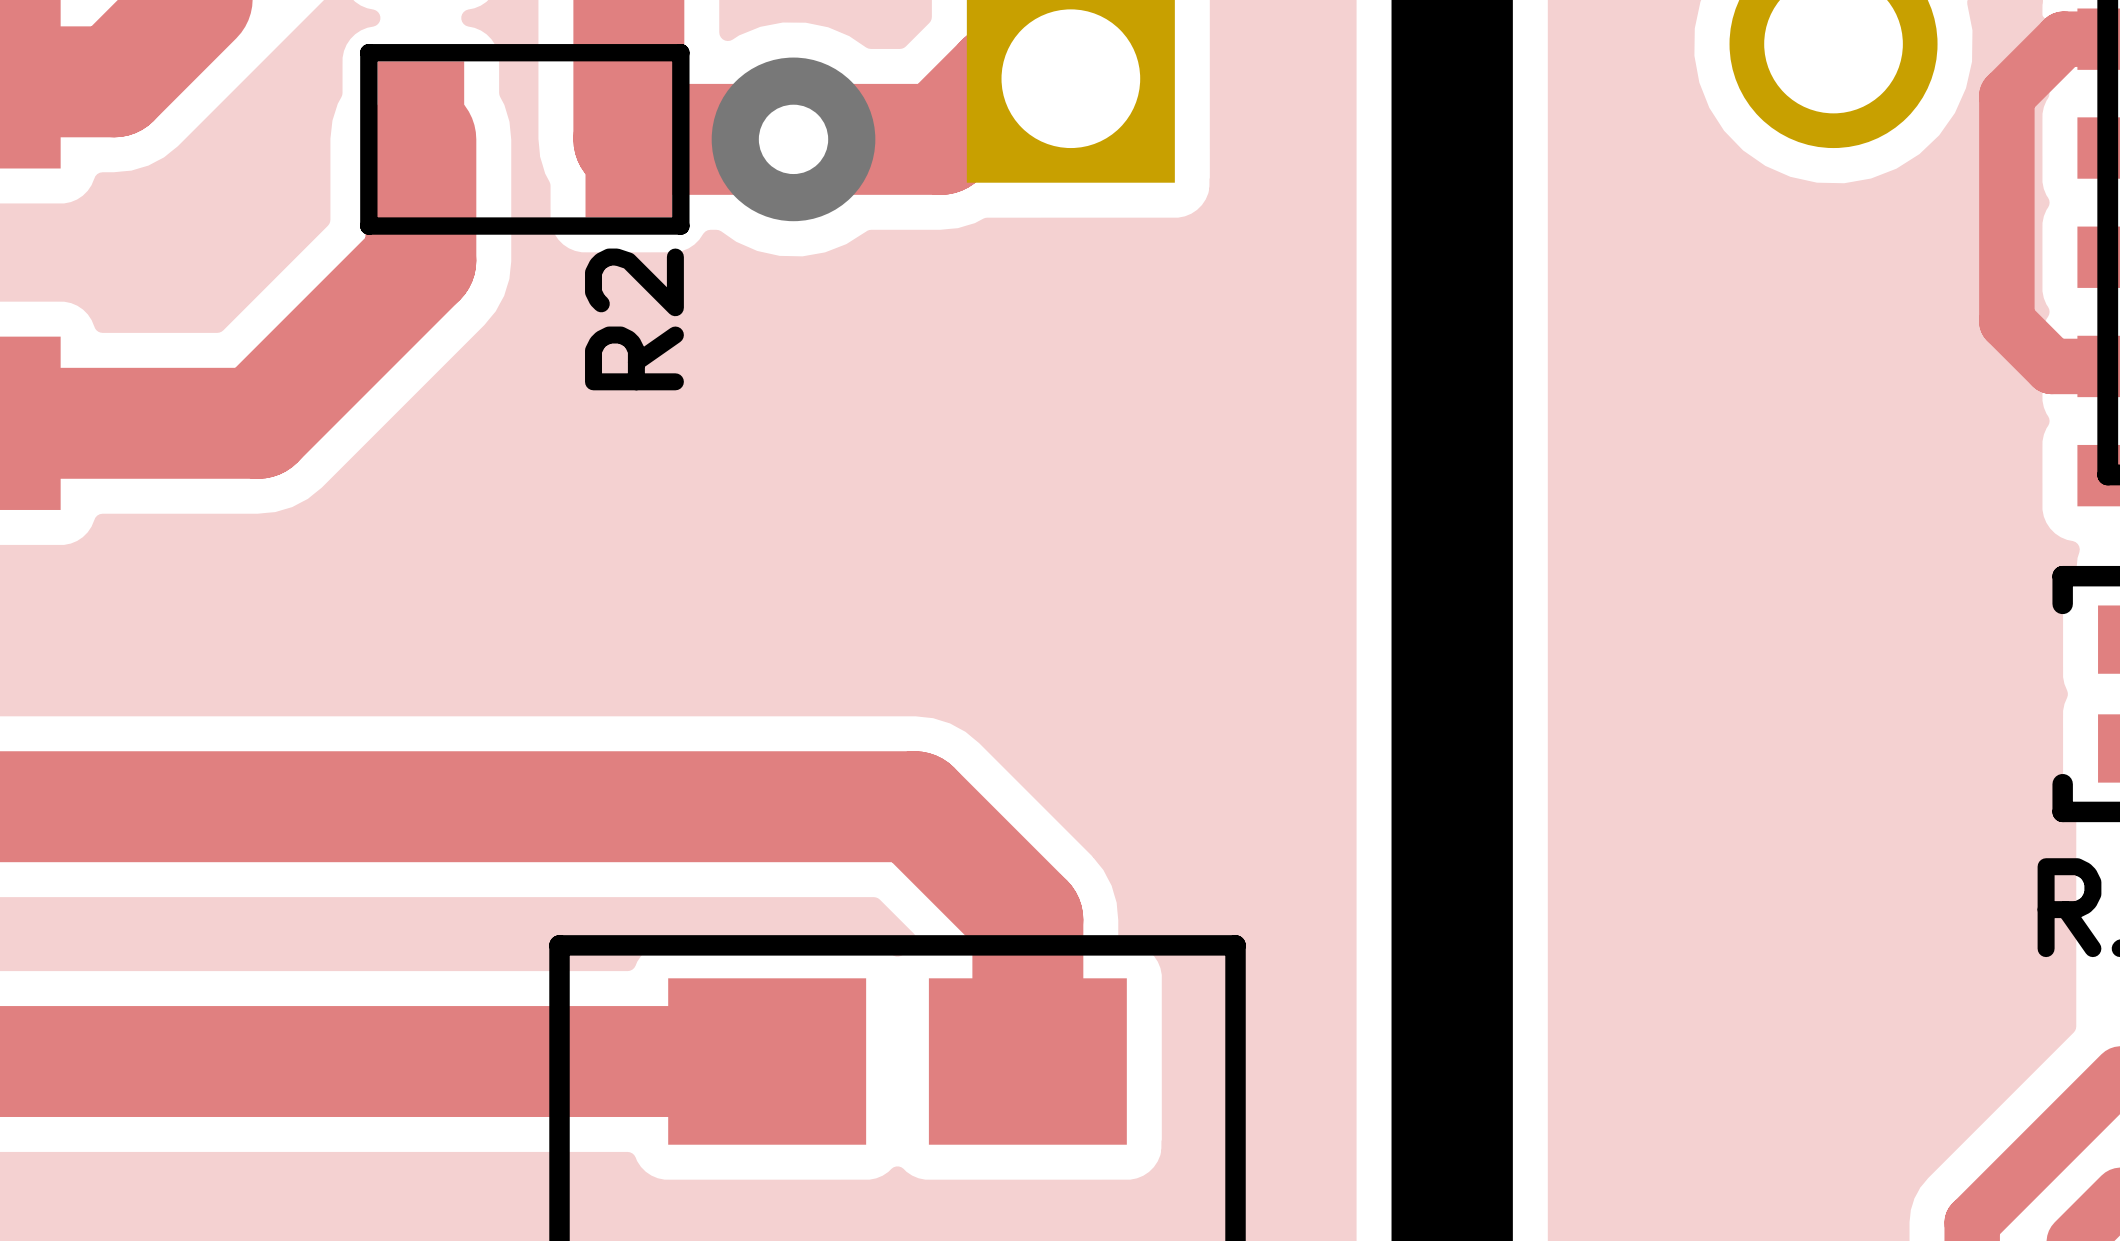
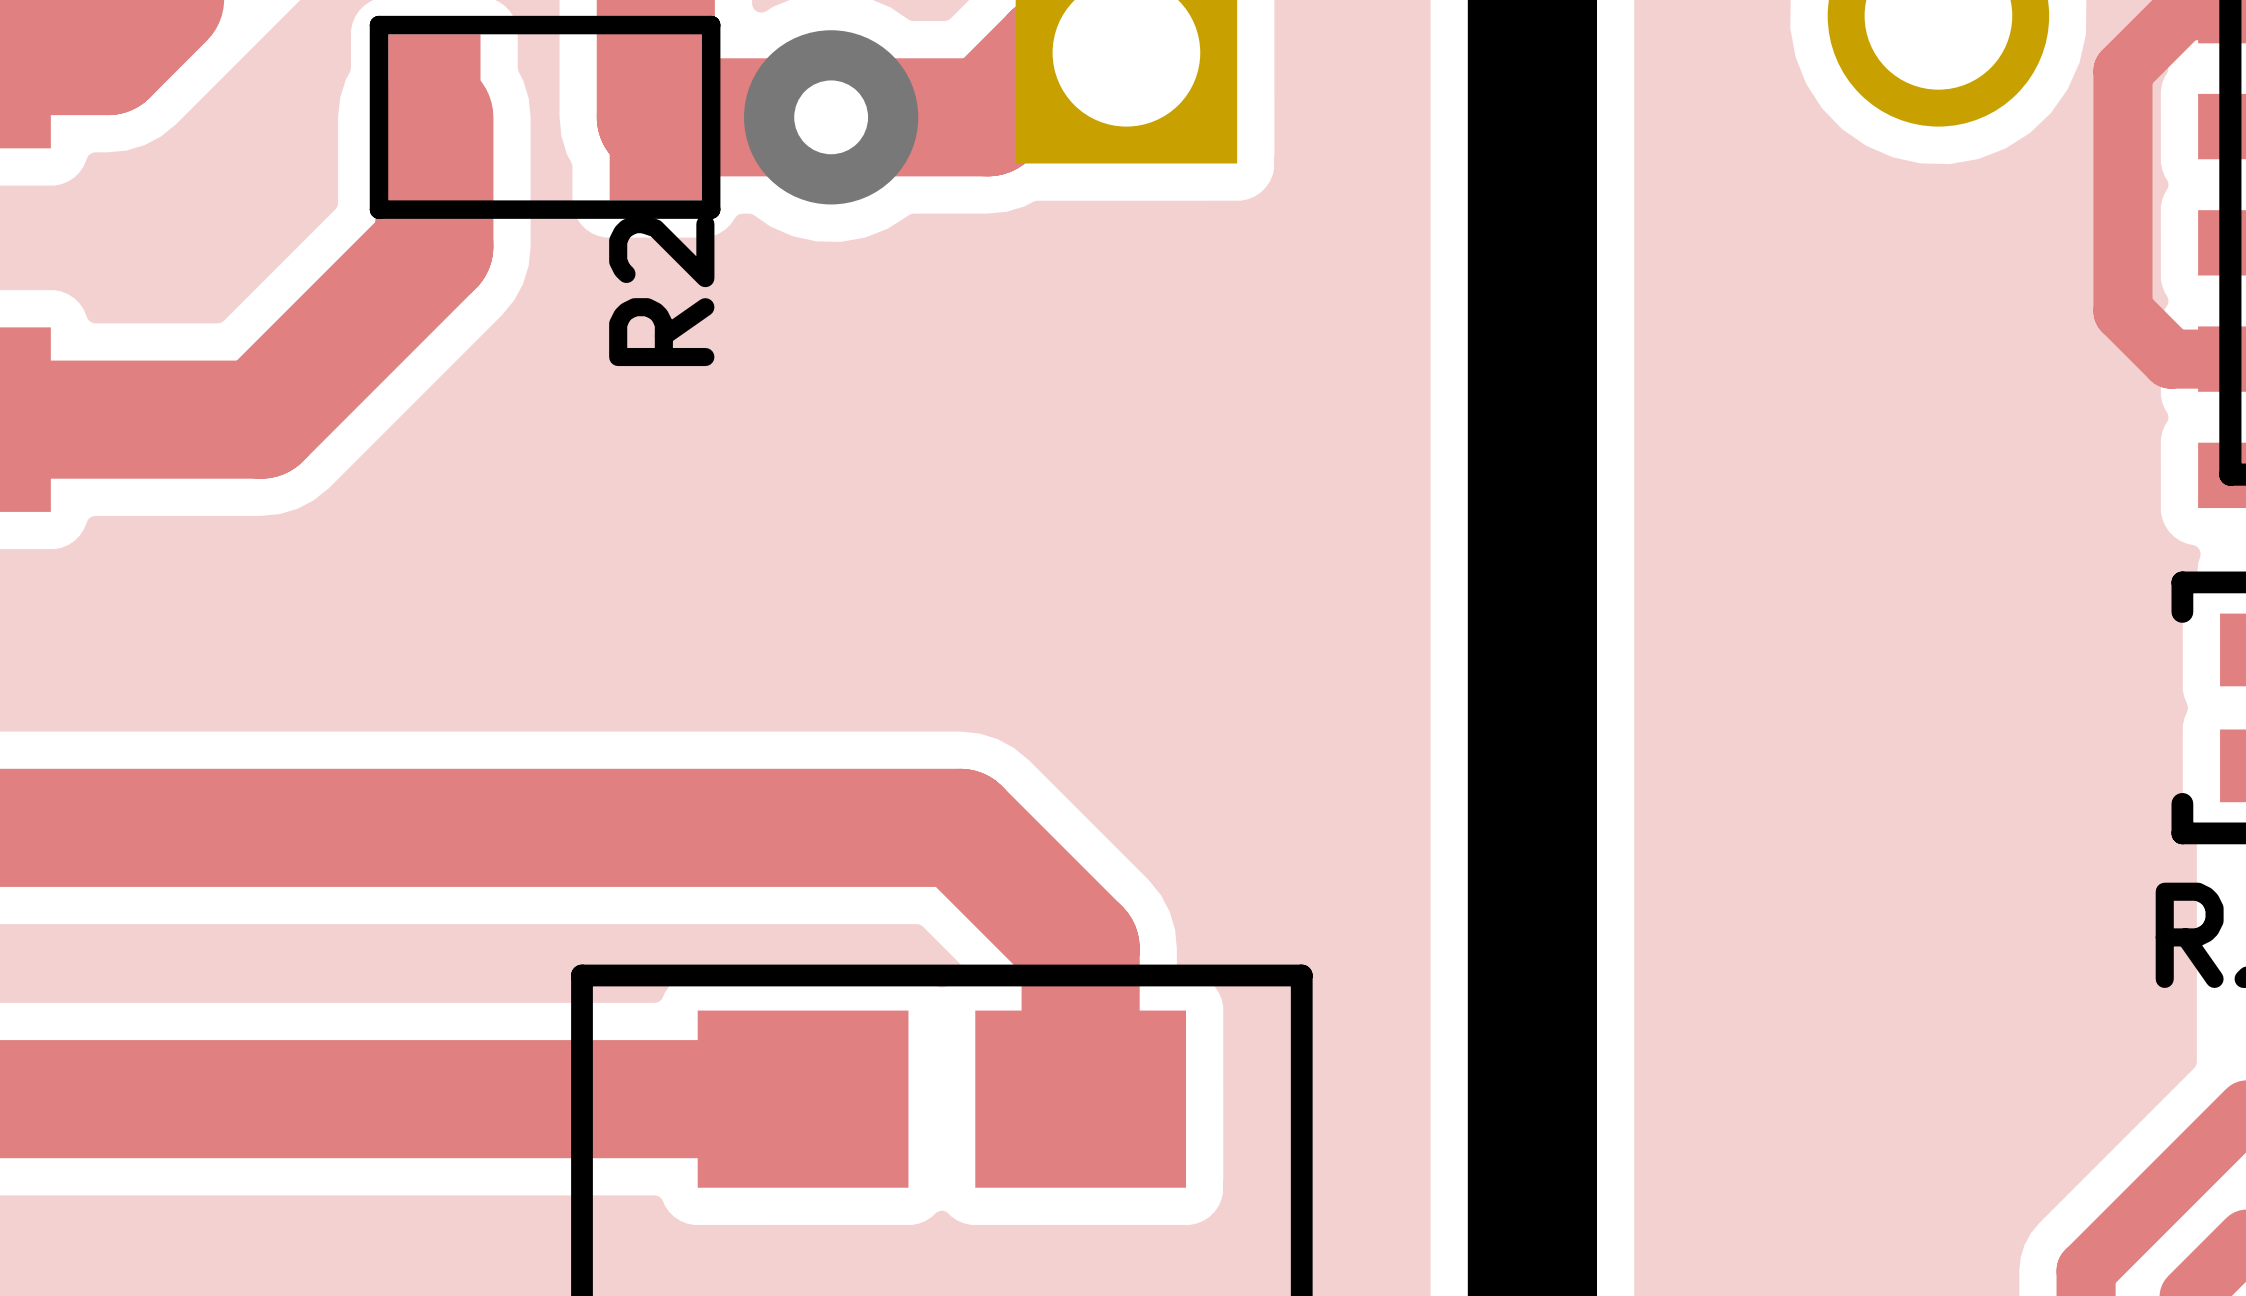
R2 name position: R2 (634, 319) -> R2 (661, 290)

